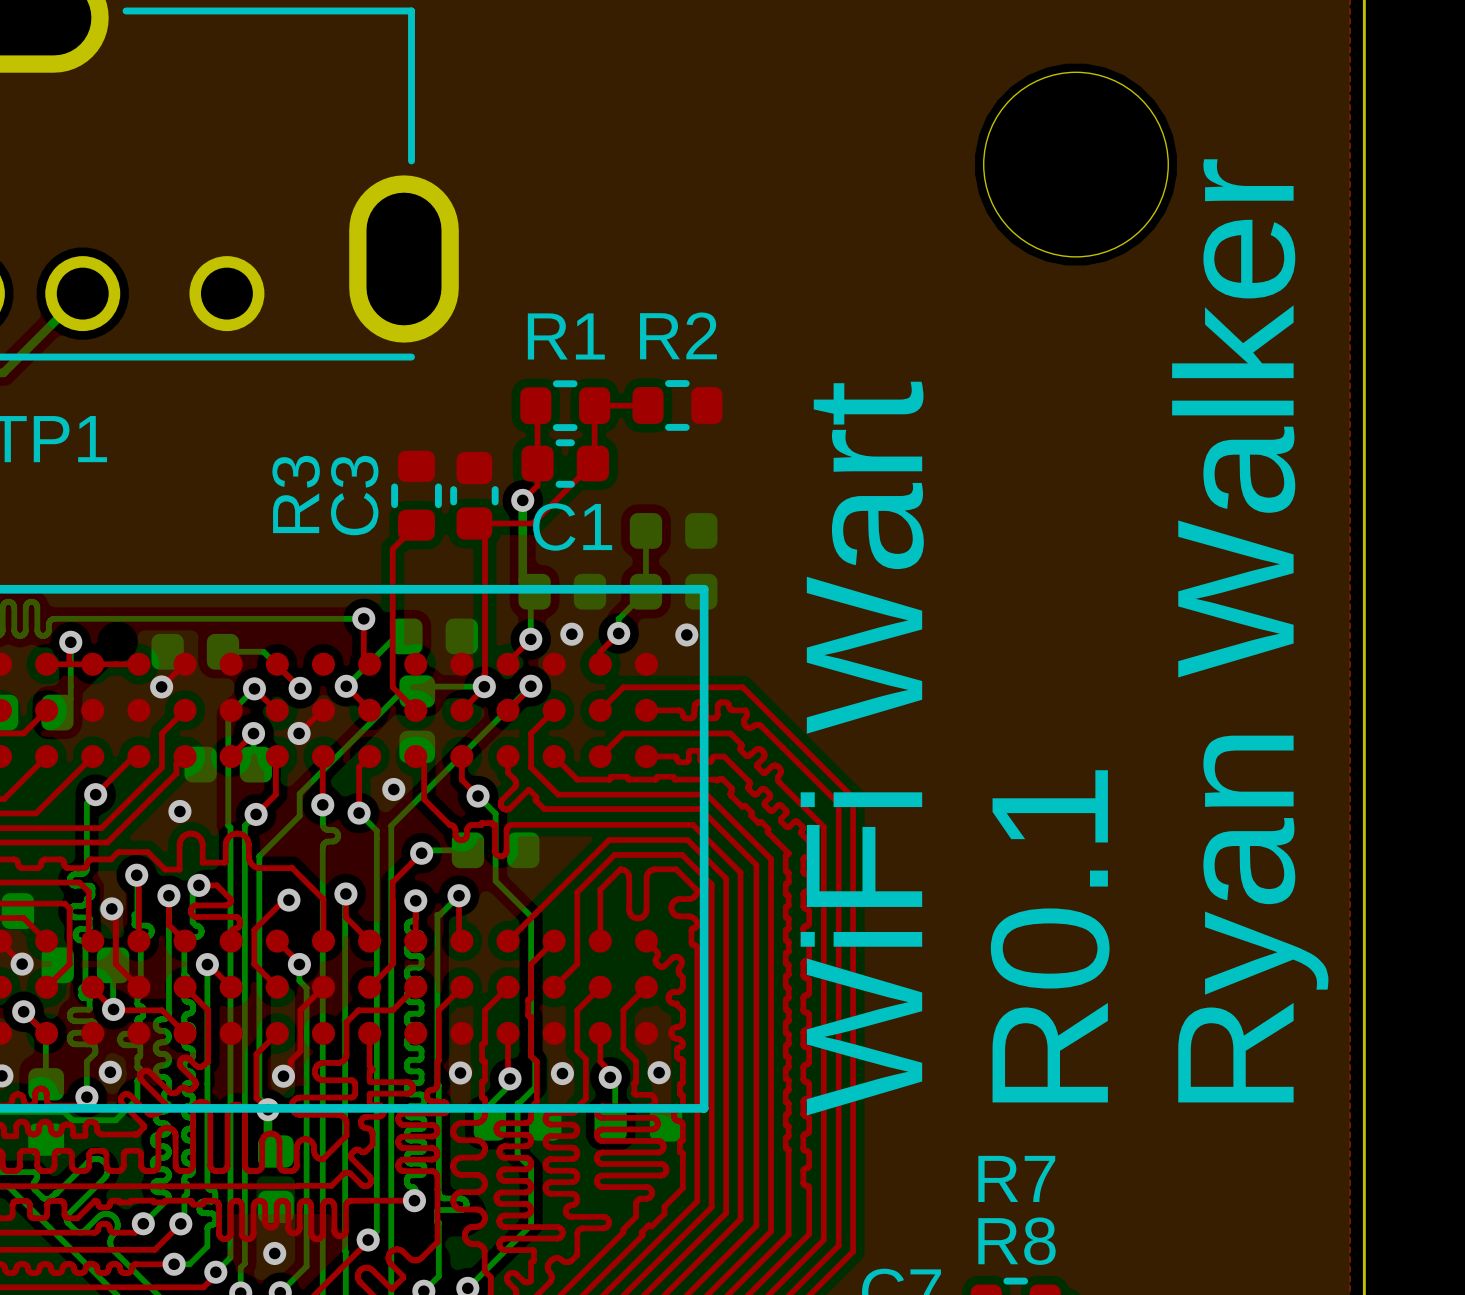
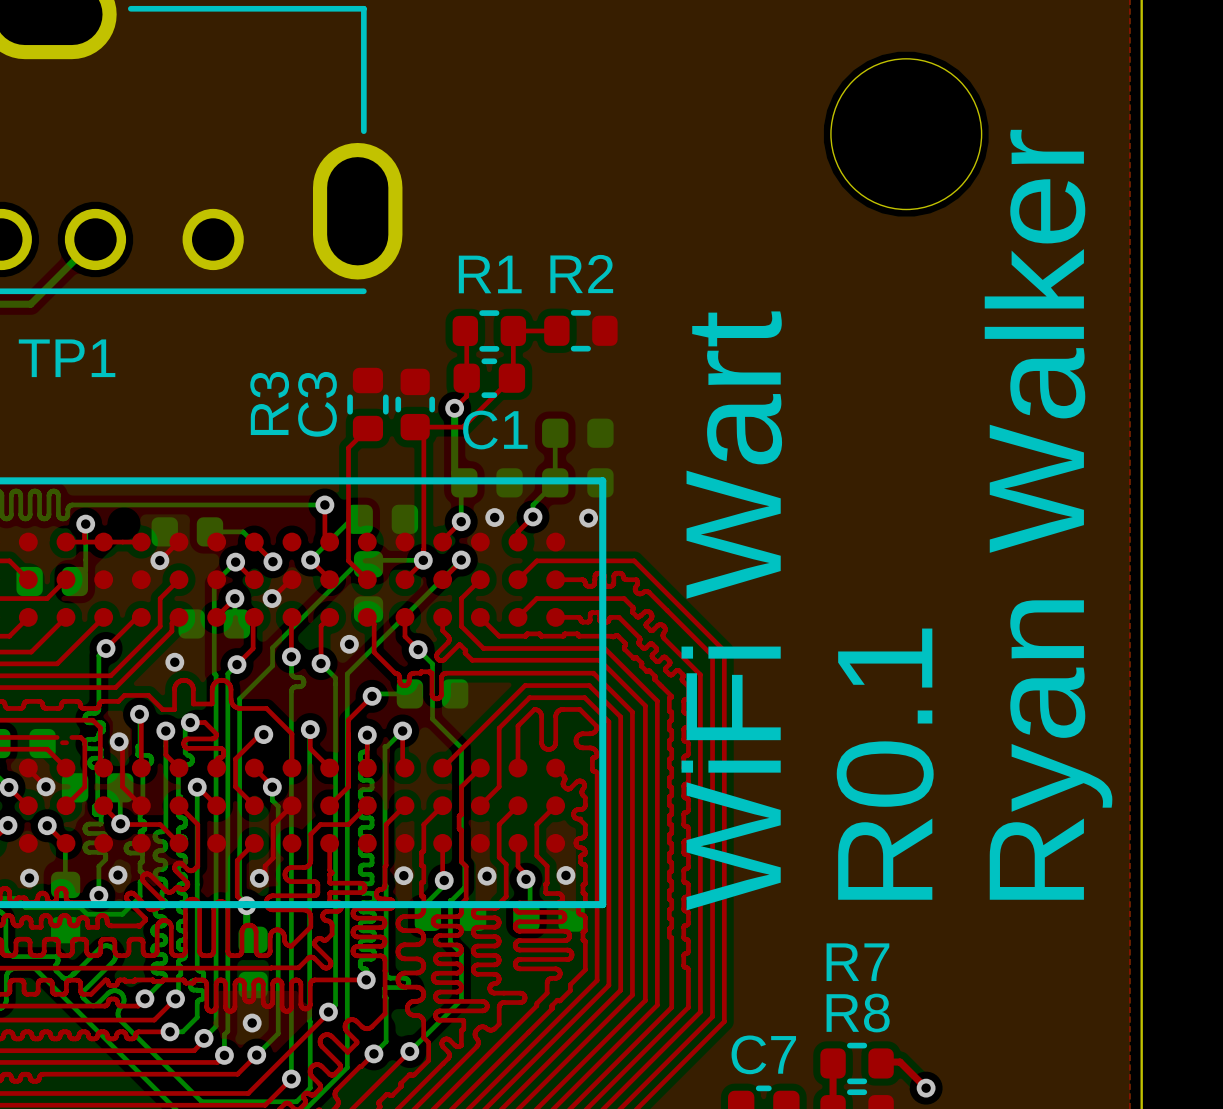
top track: (35, 903) (53, 903) -> none
top track: none -> (62, 742) (66, 742)

